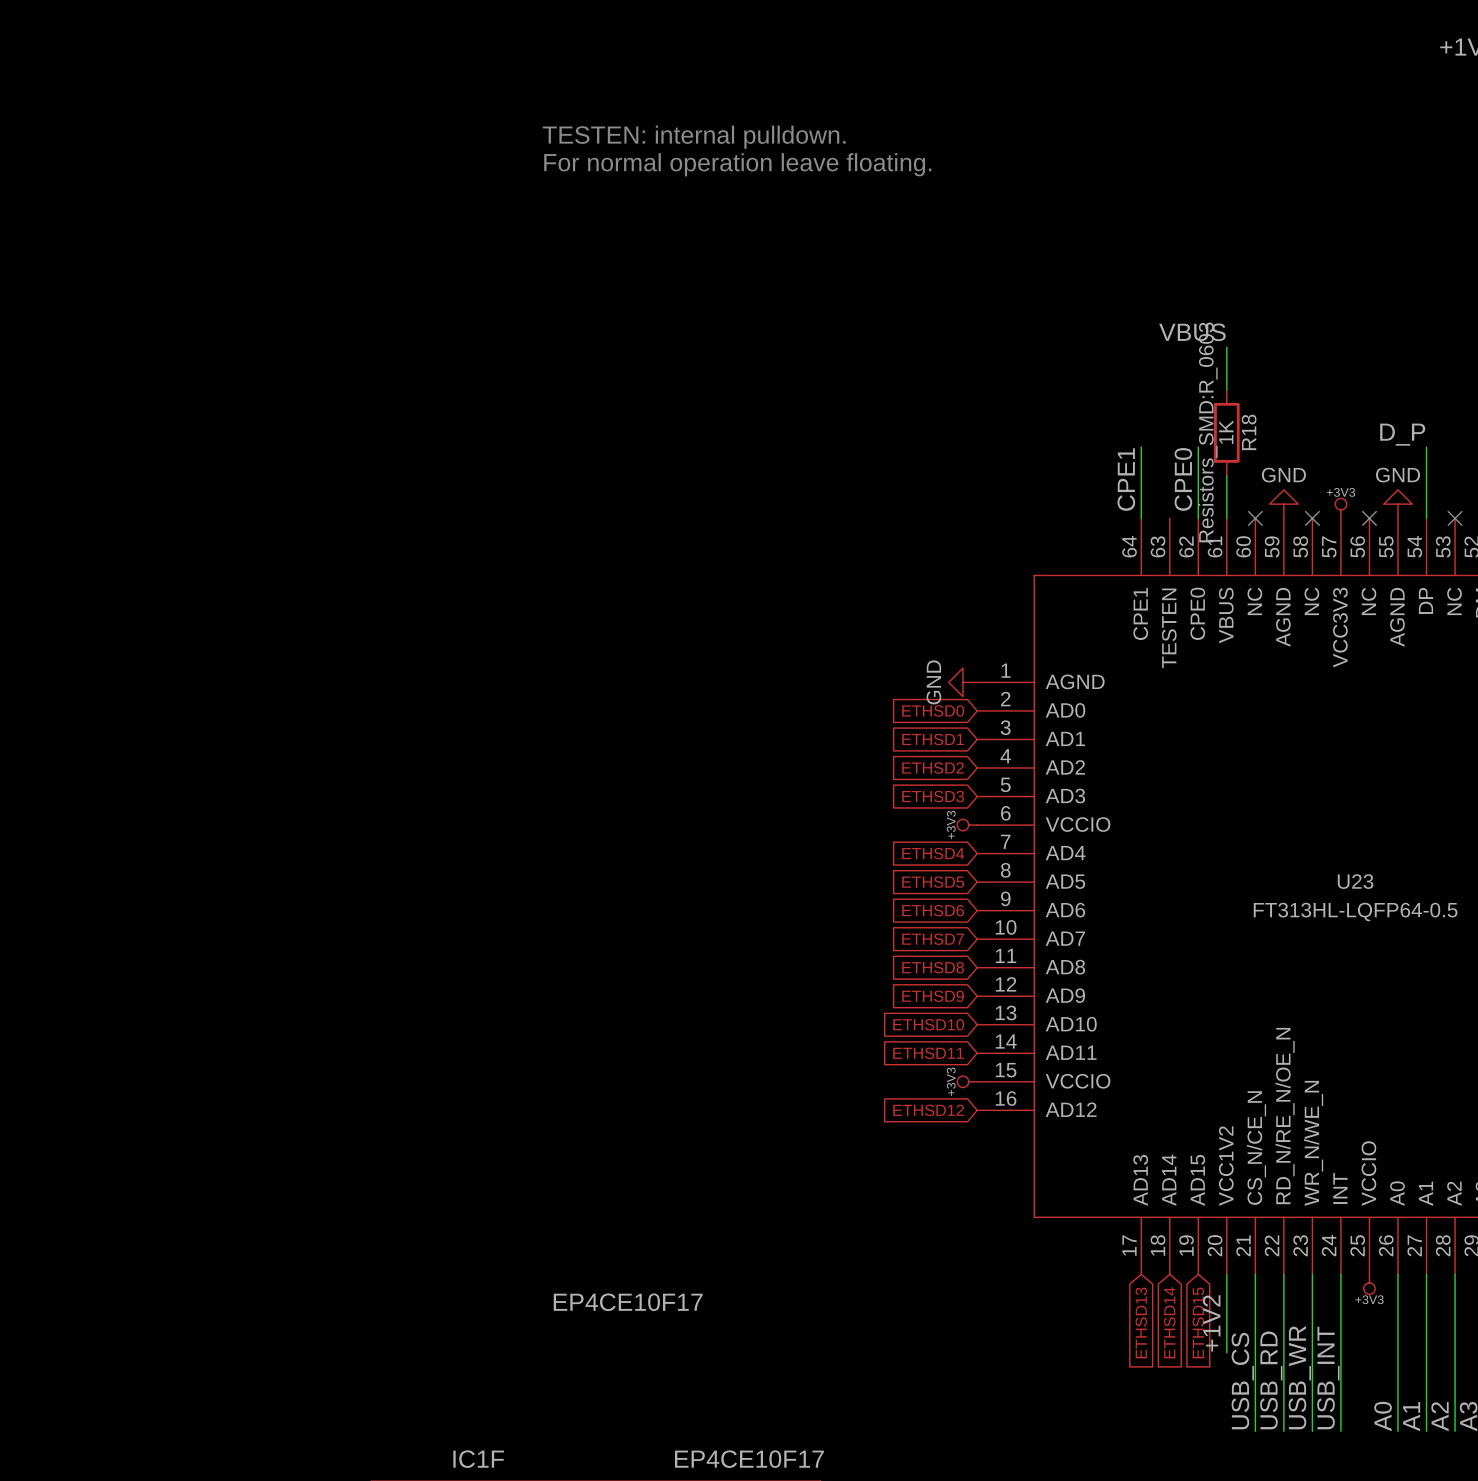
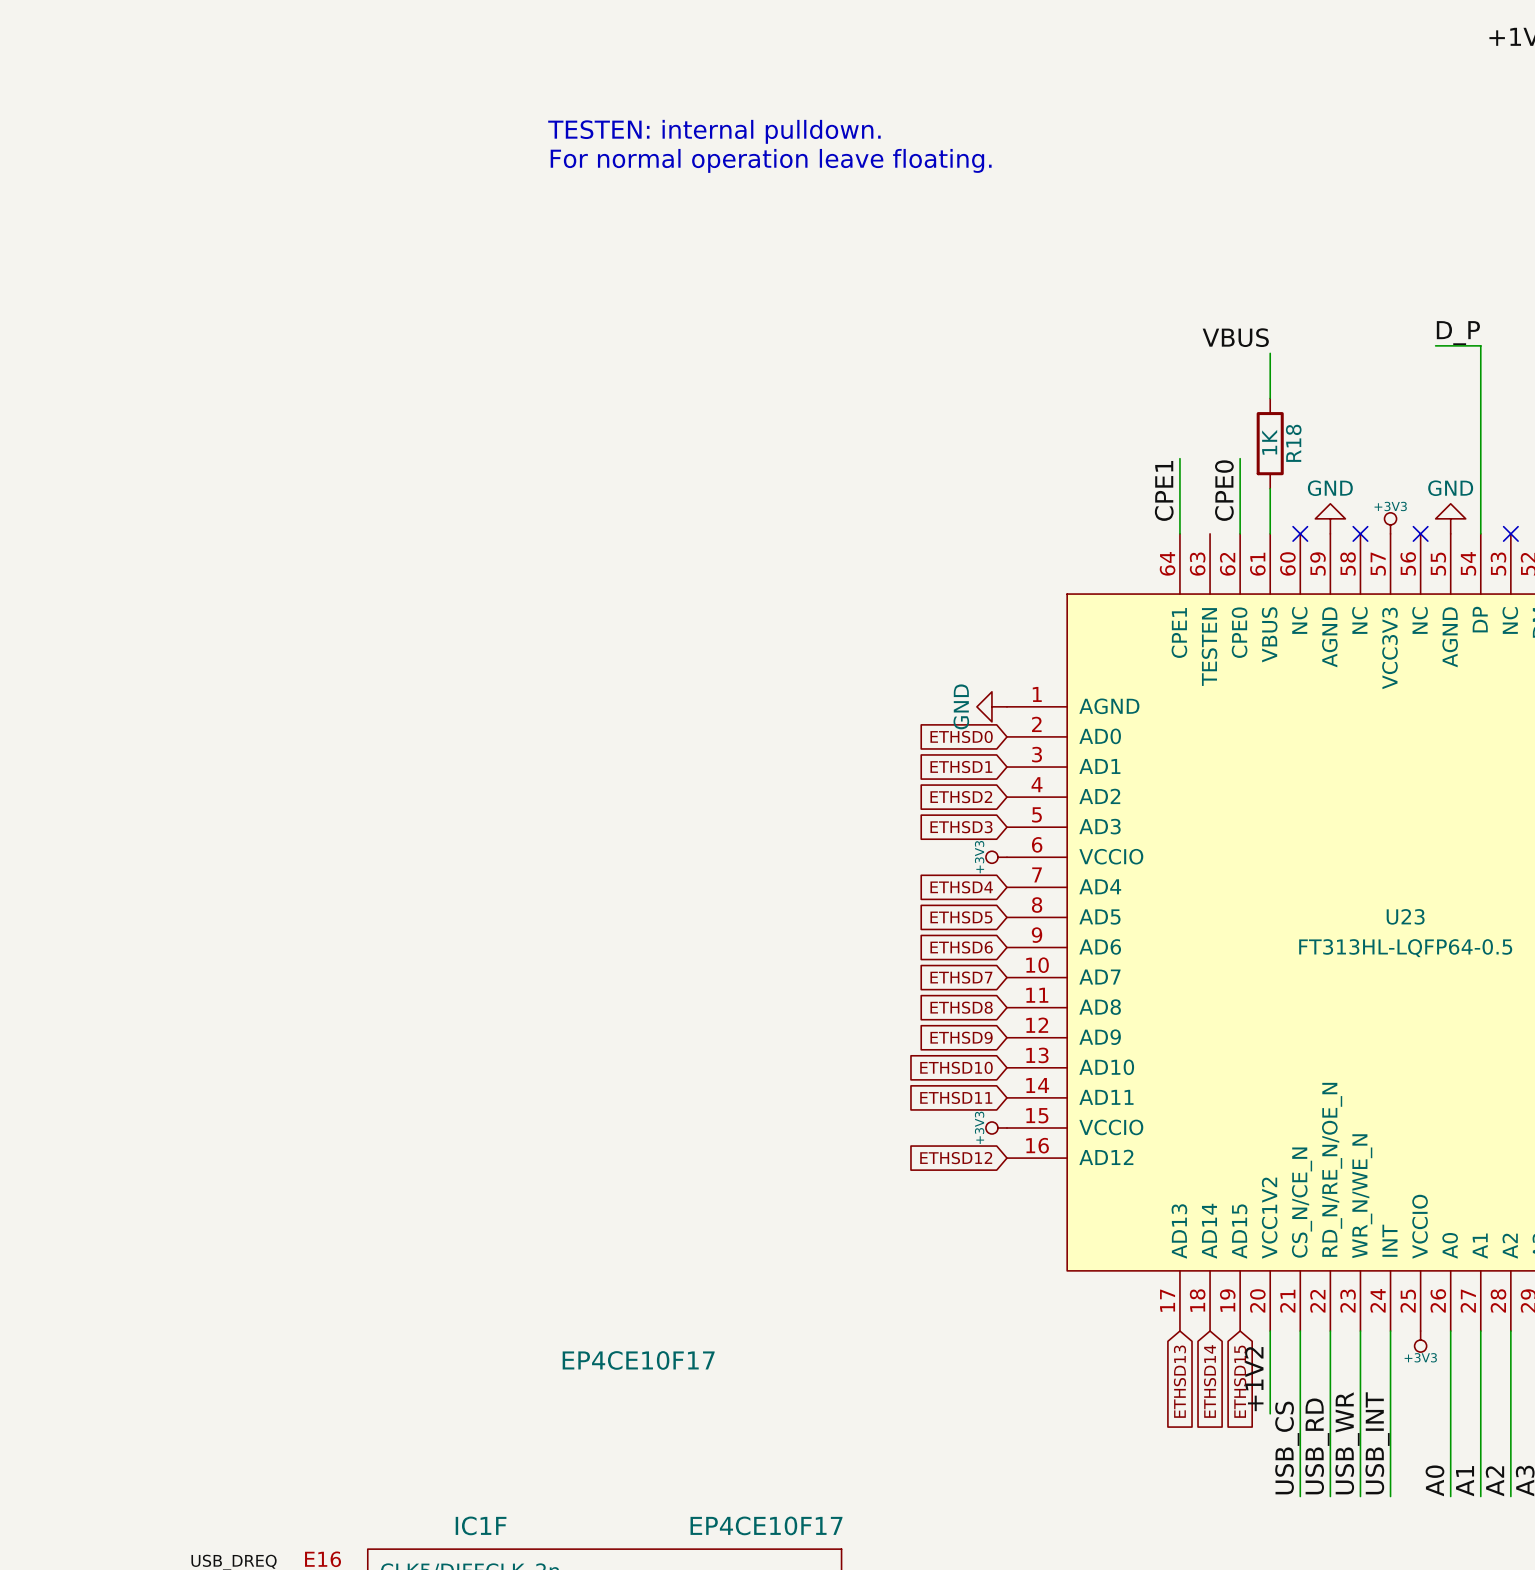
wire: none -> (1435, 345) (1480, 345) (1480, 458)
R18 text: Resistors_SMD:R_0603 (1208, 432) -> none
label position: D_P (1402, 434) -> D_P (1458, 333)

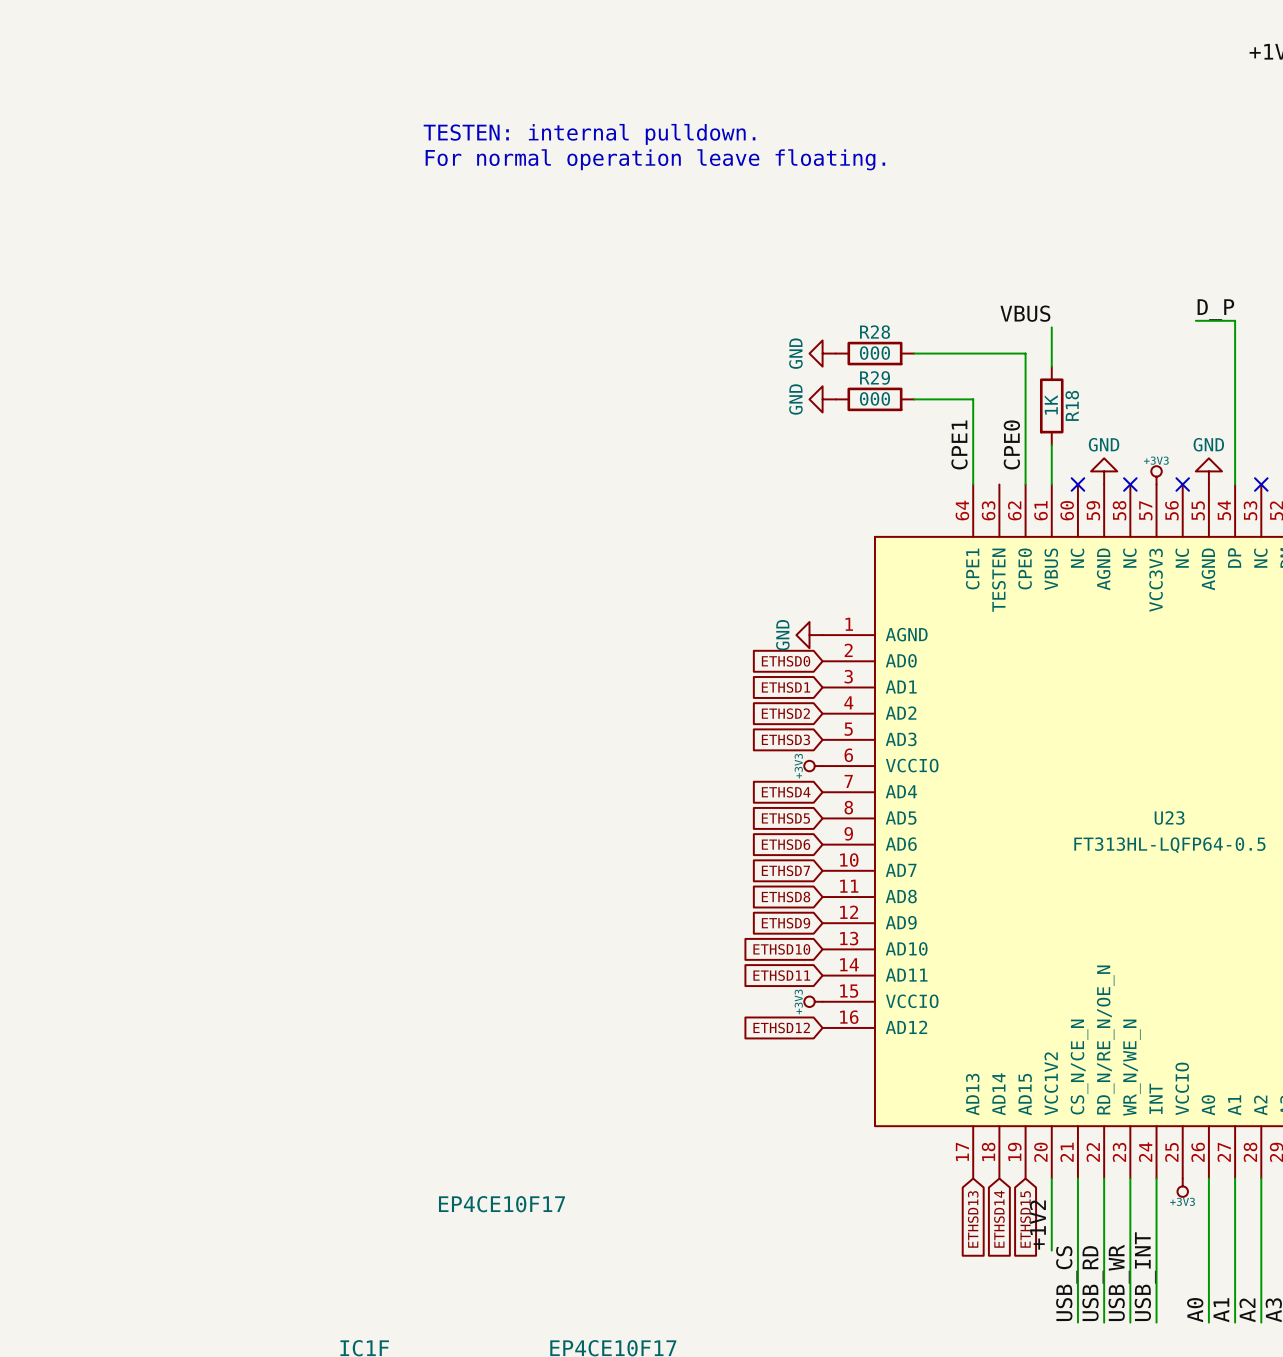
power symbol: none -> GND (822, 353)
R28: none -> 000 (874, 353)
wire: none -> (914, 353) (1025, 353) (1025, 419)
power symbol: none -> GND (822, 399)
R29: none -> 000 (874, 399)
wire: none -> (914, 399) (973, 399) (973, 419)

